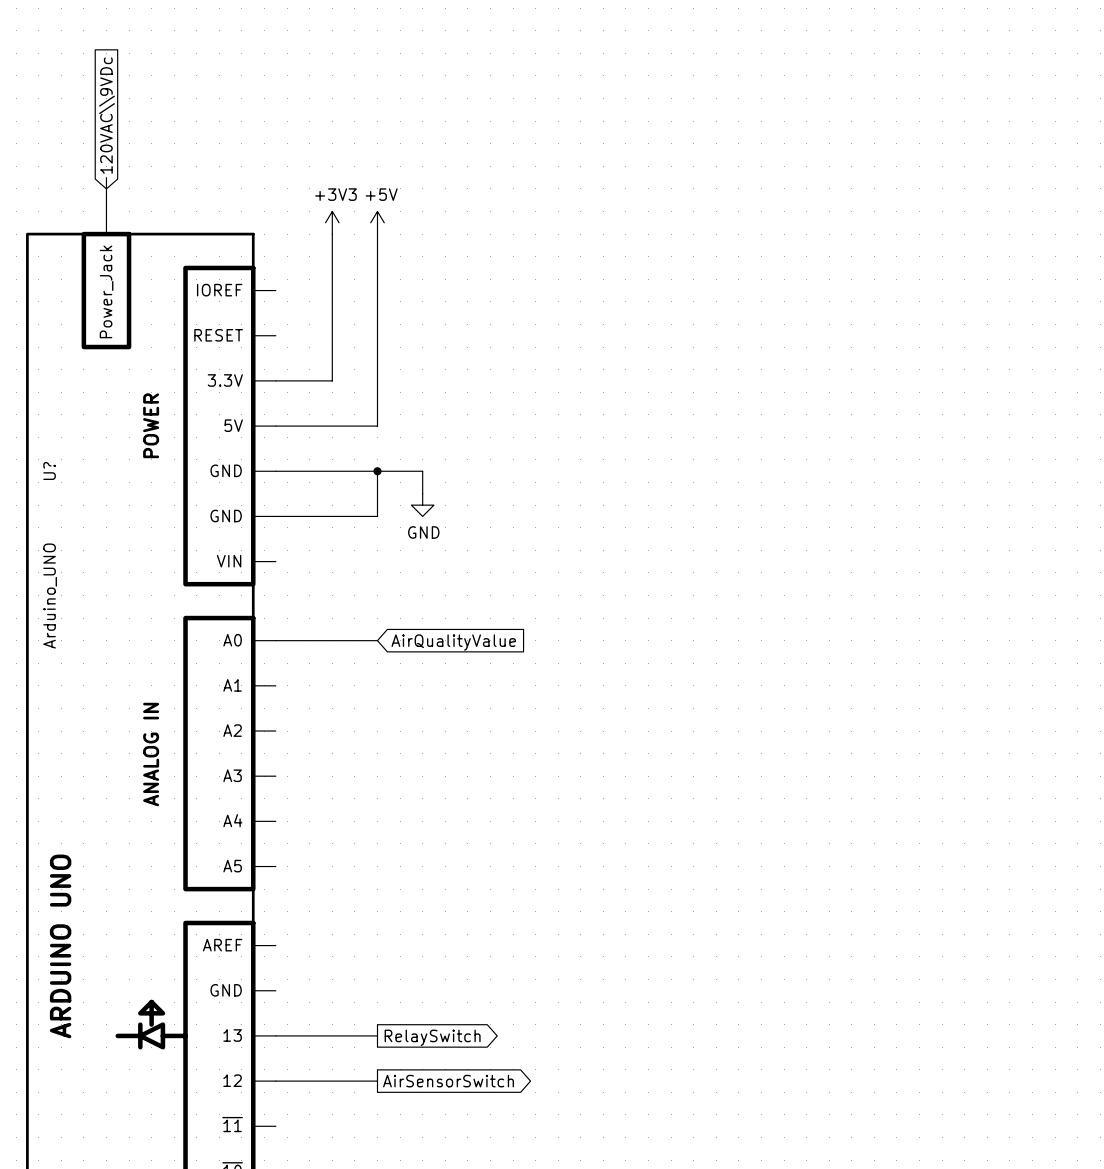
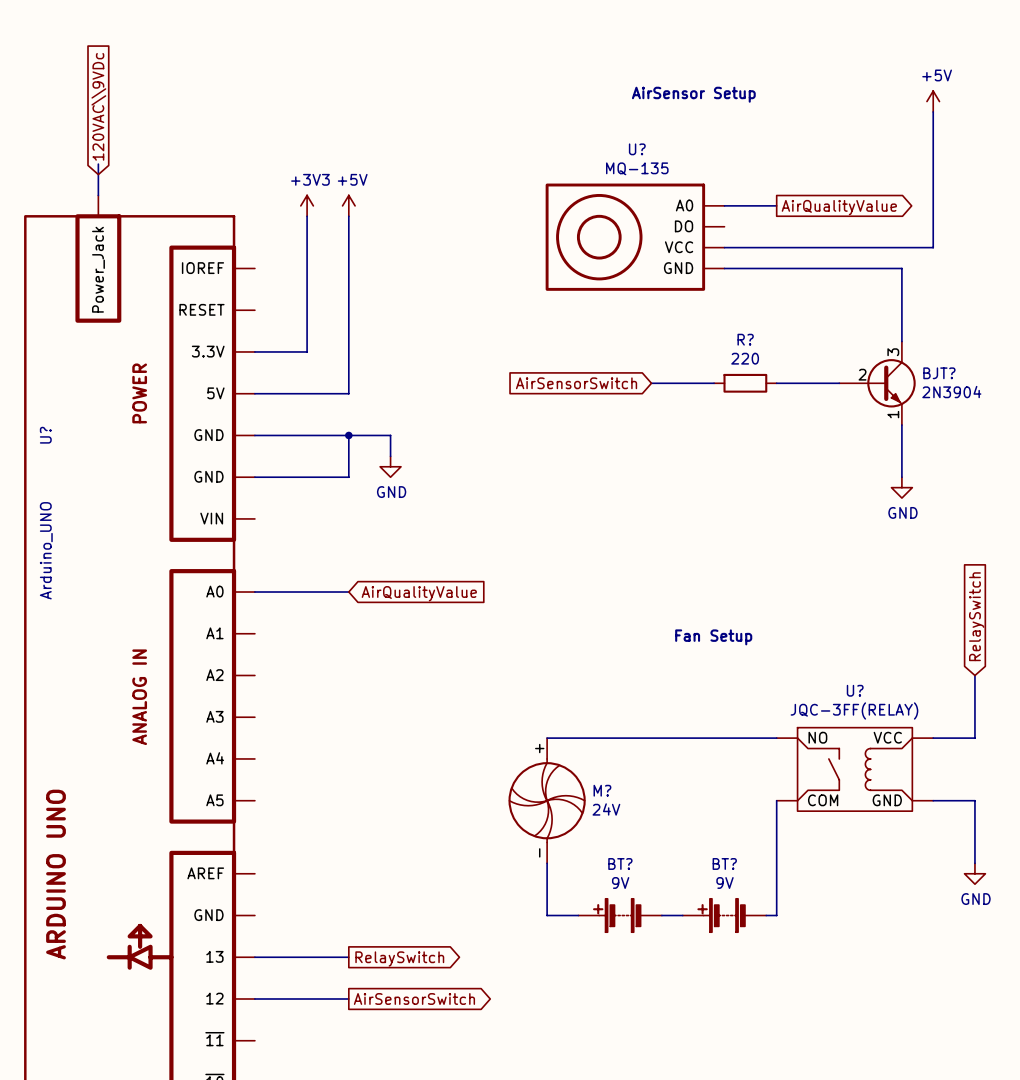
text: none -> AirSensor Setup (693, 94)
power symbol: none -> +5V (933, 101)
wire: none -> (933, 111) (933, 247) (724, 247)
wire: none -> (724, 205) (776, 205)
global label: none -> AirQualityValue (839, 207)
U?: none -> MQ-135 (635, 237)
wire: none -> (724, 268) (901, 268) (901, 341)
global label: none -> AirSensorSwitch (576, 383)
wire: none -> (651, 383) (714, 383)
R?: none -> 220 (745, 383)
wire: none -> (776, 383) (839, 383)
BJT?: none -> 2N3904 (877, 383)
wire: none -> (901, 425) (901, 477)
power symbol: none -> GND (901, 487)
global label: none -> RelaySwitch (976, 616)
text: none -> Fan Setup (713, 637)
wire: none -> (974, 675) (974, 738) (933, 738)
wire: none -> (547, 738) (776, 738)
U?: none -> JQC-3FF(RELAY) (854, 769)
M?: none -> 24V (547, 800)
wire: none -> (776, 800) (776, 915) (766, 915)
wire: none -> (933, 800) (974, 800) (974, 863)
wire: none -> (547, 863) (547, 915) (578, 915)
power symbol: none -> GND (974, 873)
BT?: none -> 9V (620, 915)
wire: none -> (661, 915) (682, 915)
BT?: none -> 9V (724, 915)

